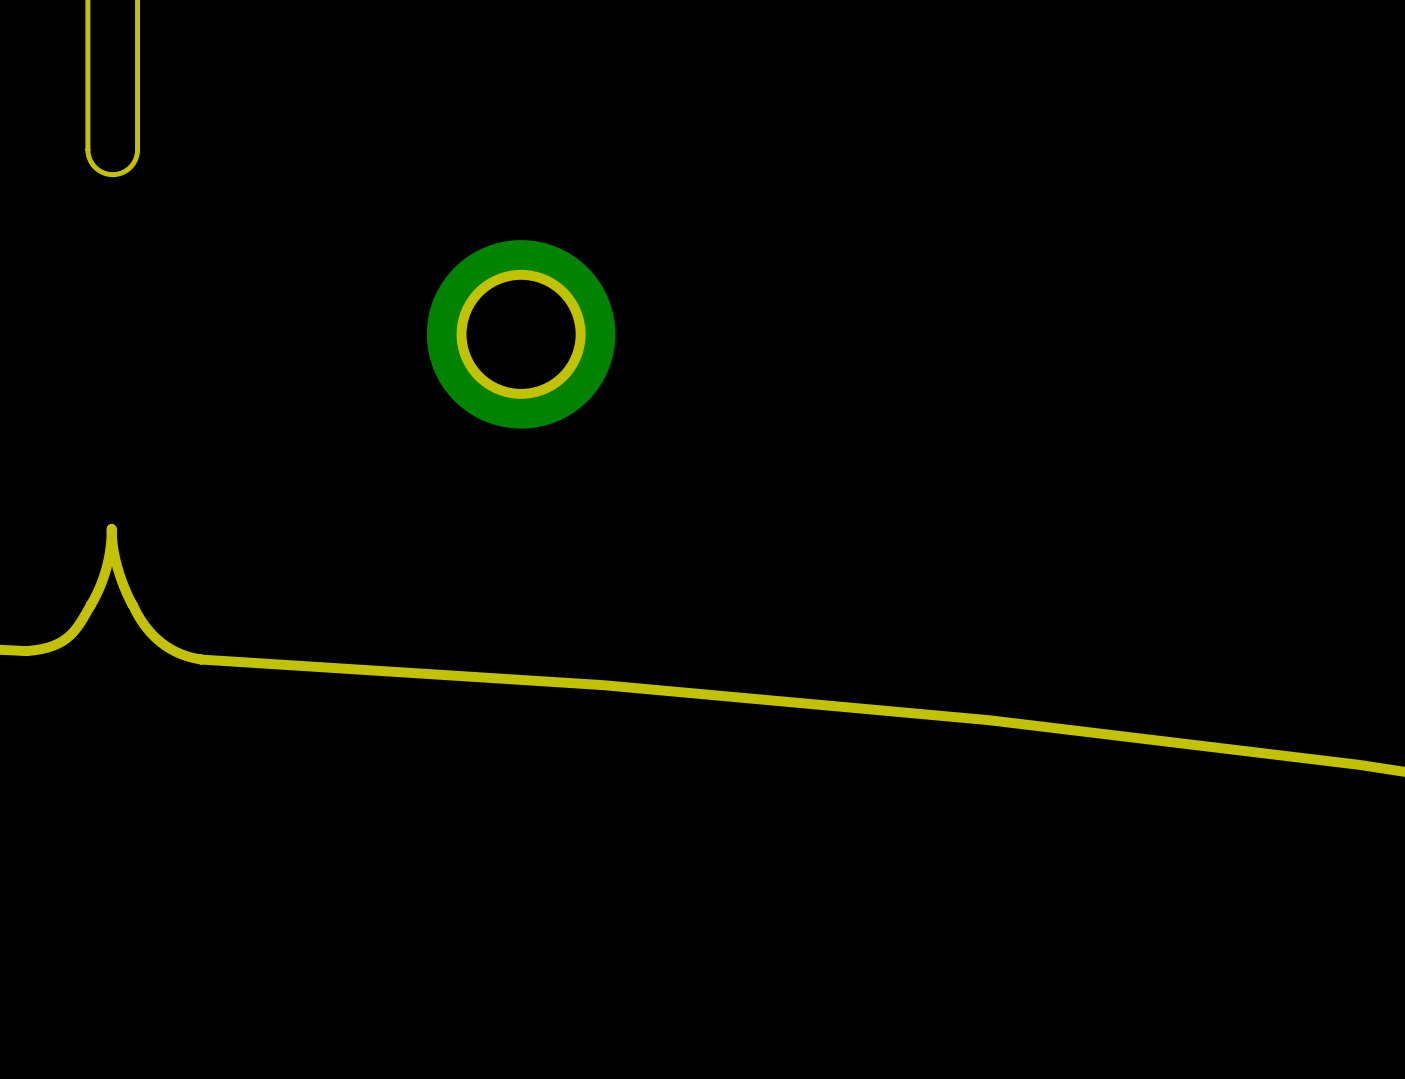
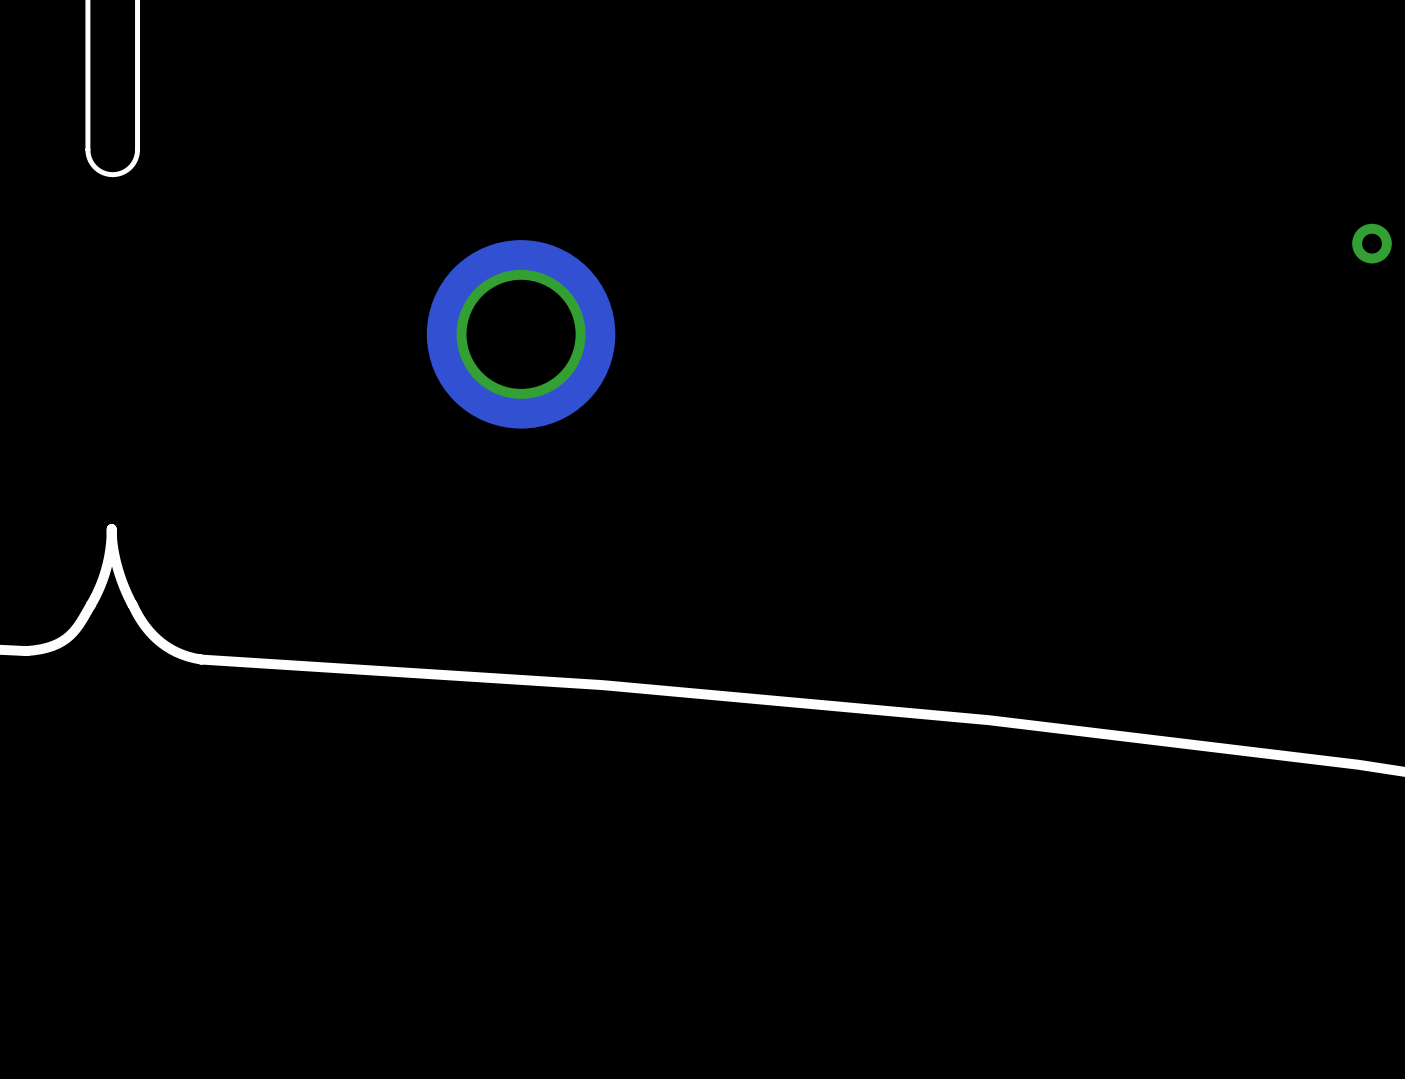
via: none -> (1372, 243)

